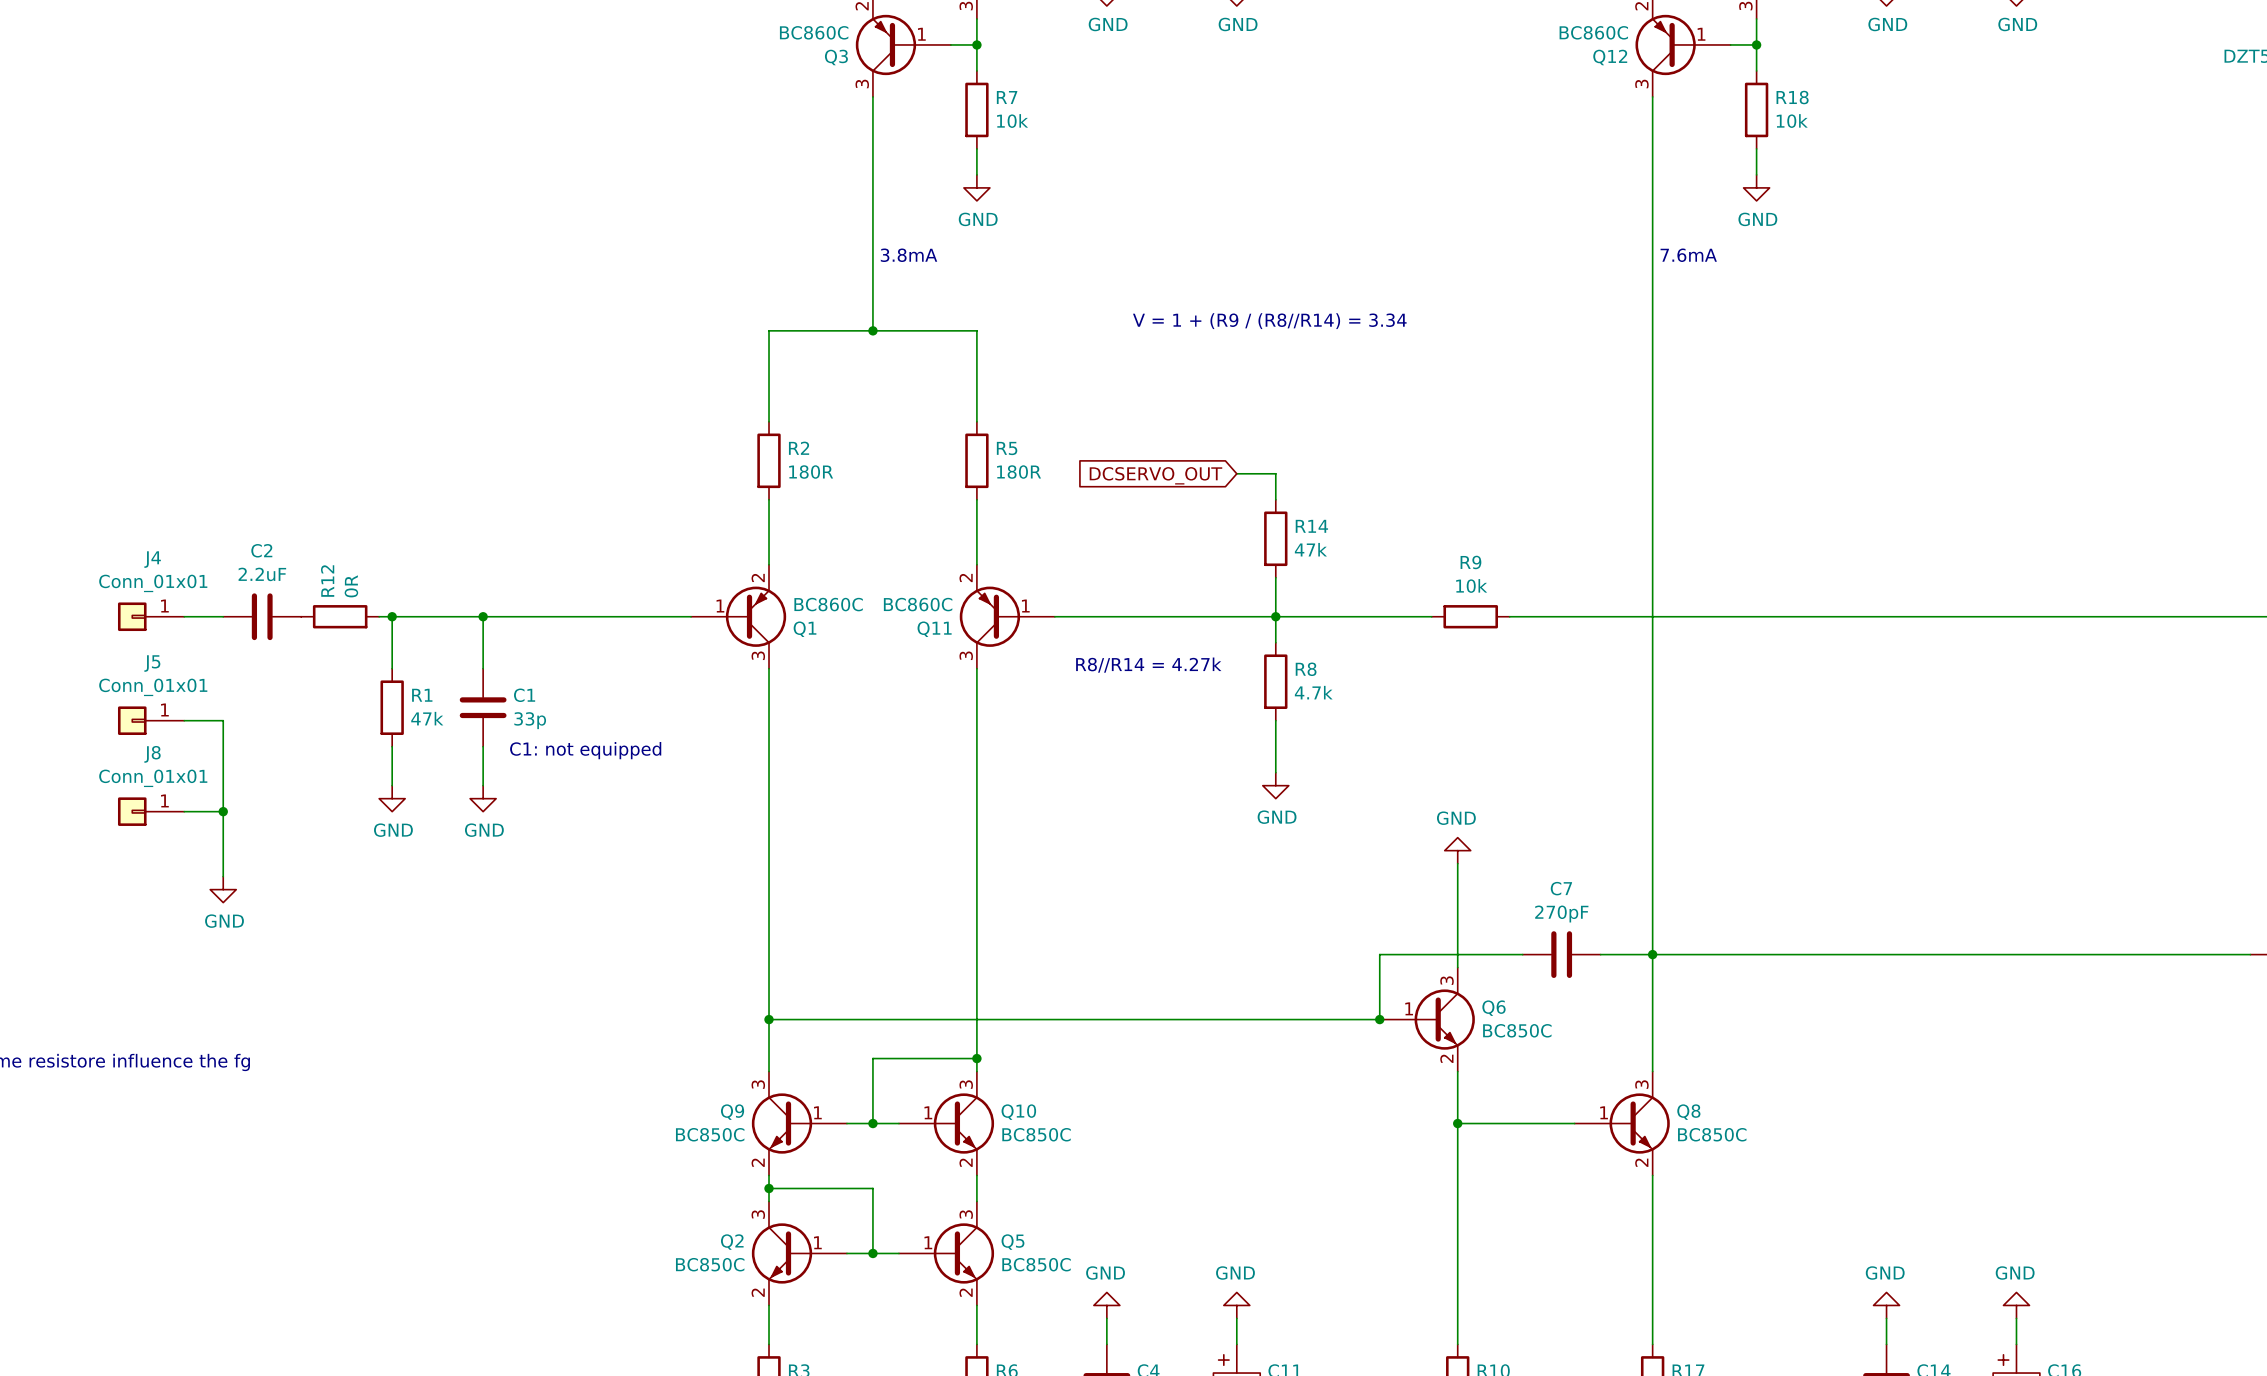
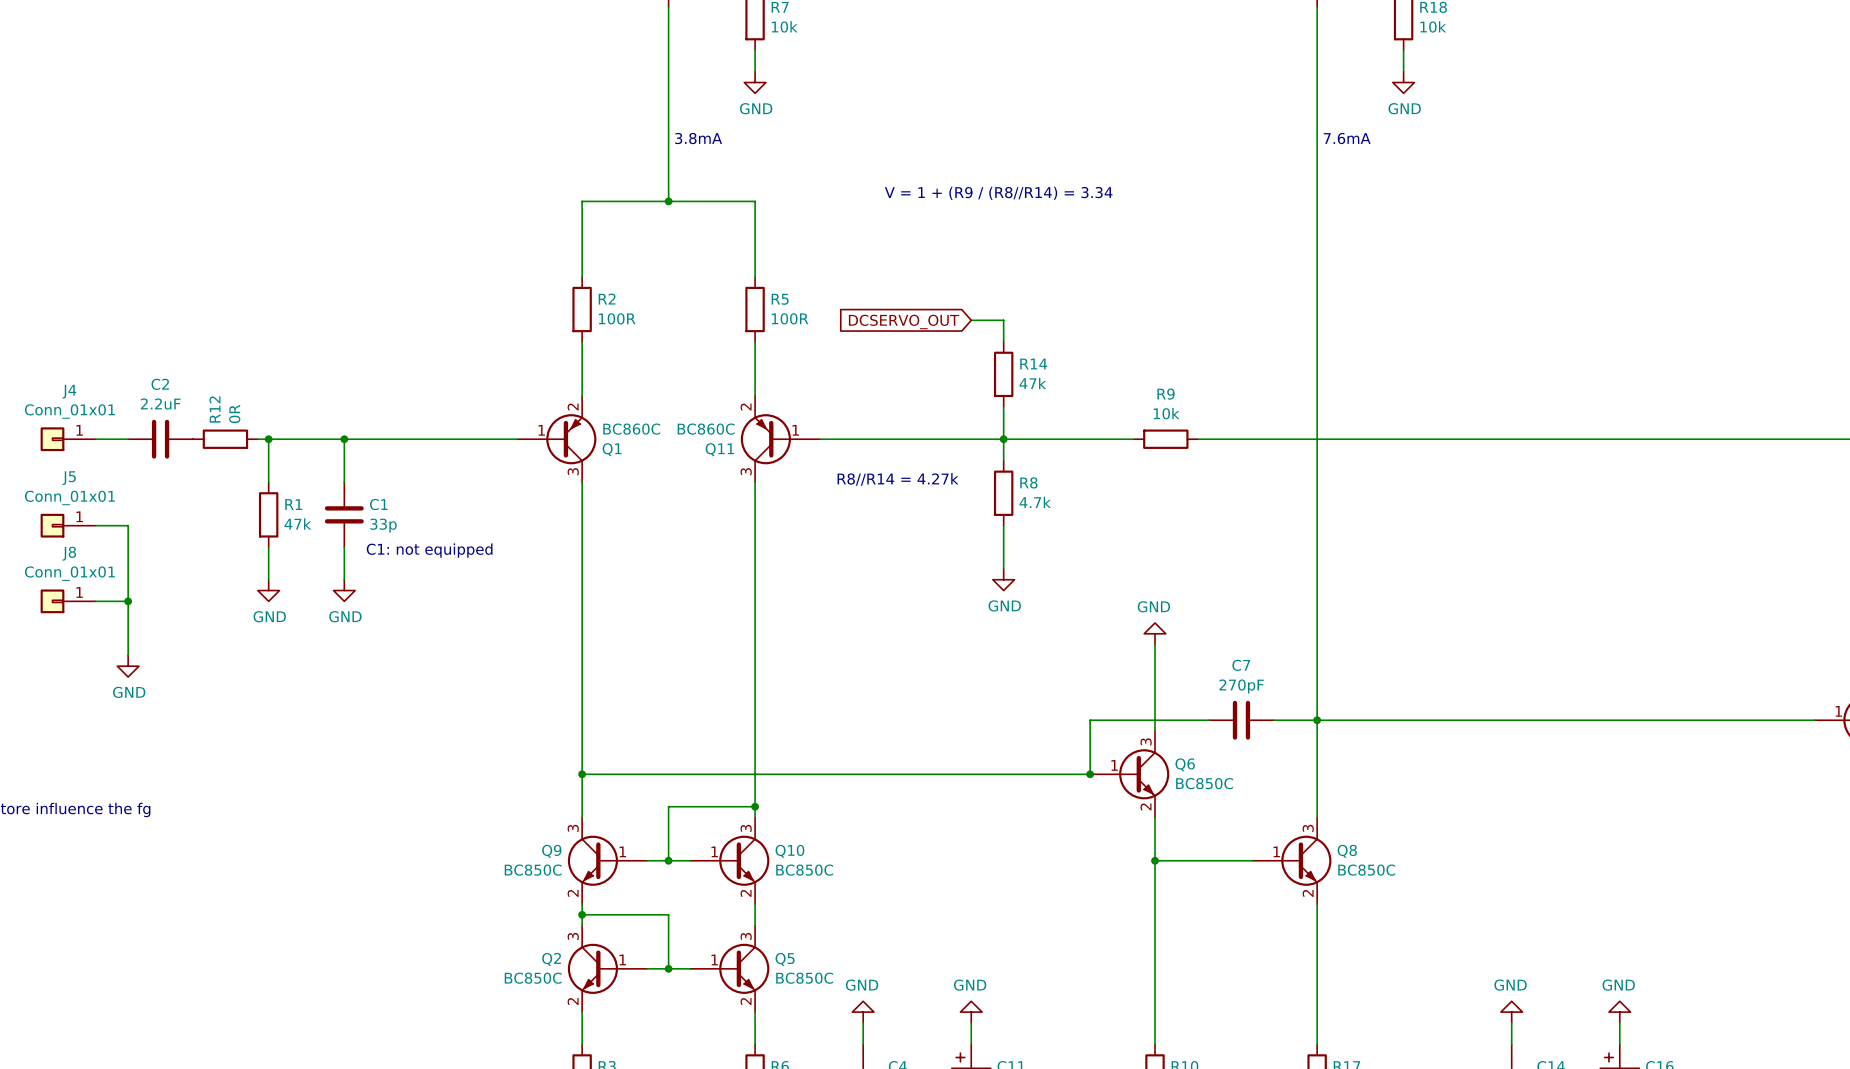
R2 value: 180R (811, 472) -> 100R (617, 318)
R5 value: 180R (1019, 472) -> 100R (790, 318)

